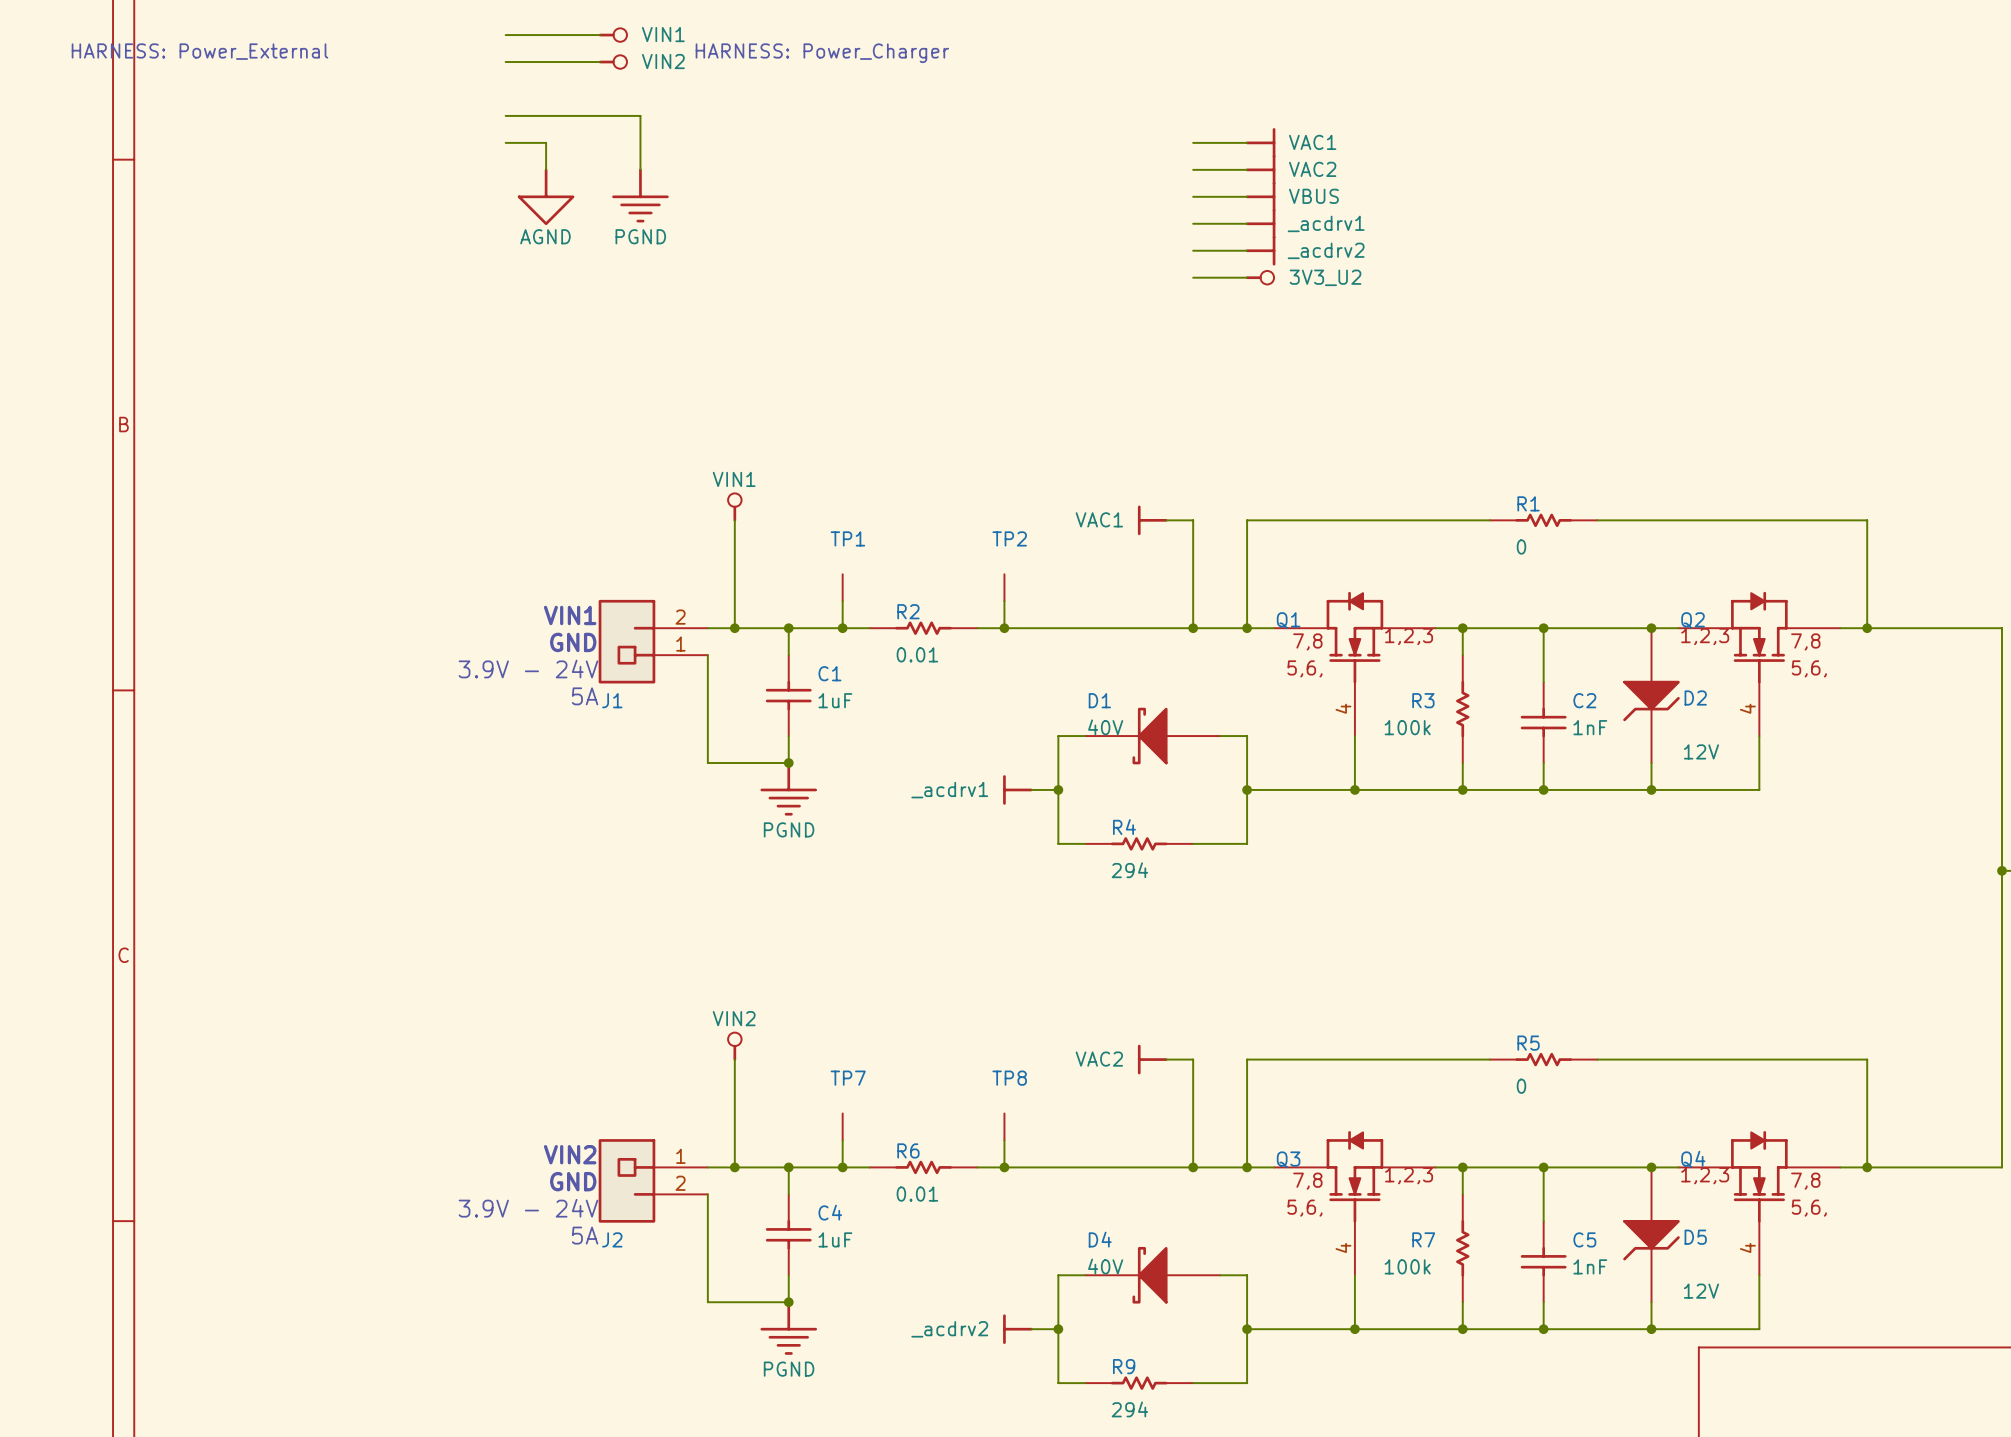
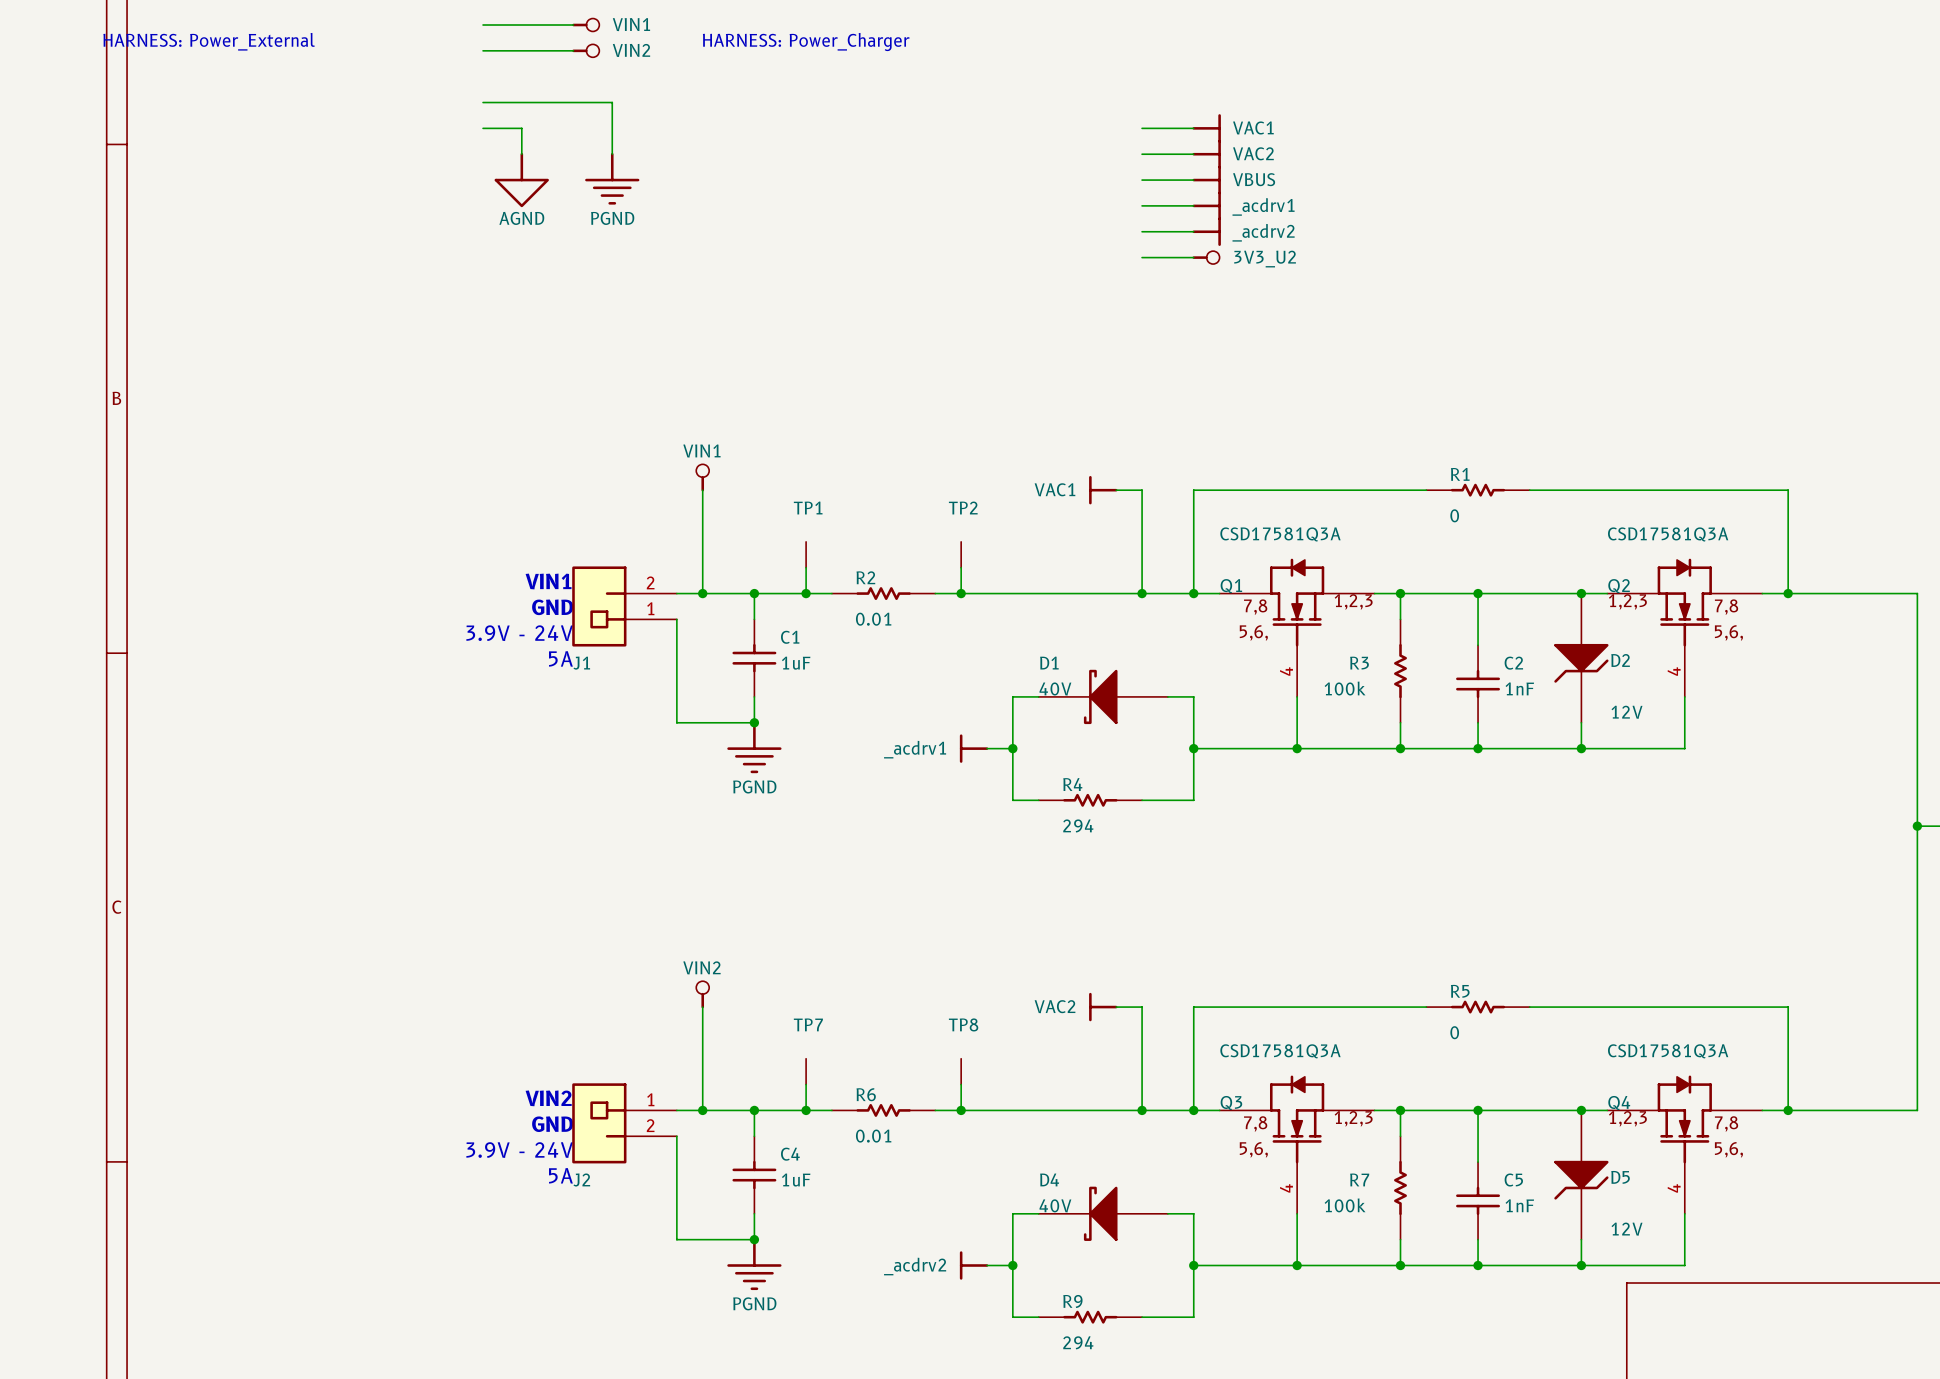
Q1 value: none -> CSD17581Q3A (1280, 534)
Q2 value: none -> CSD17581Q3A (1668, 534)
Q3 value: none -> CSD17581Q3A (1280, 1051)
Q4 value: none -> CSD17581Q3A (1668, 1051)

